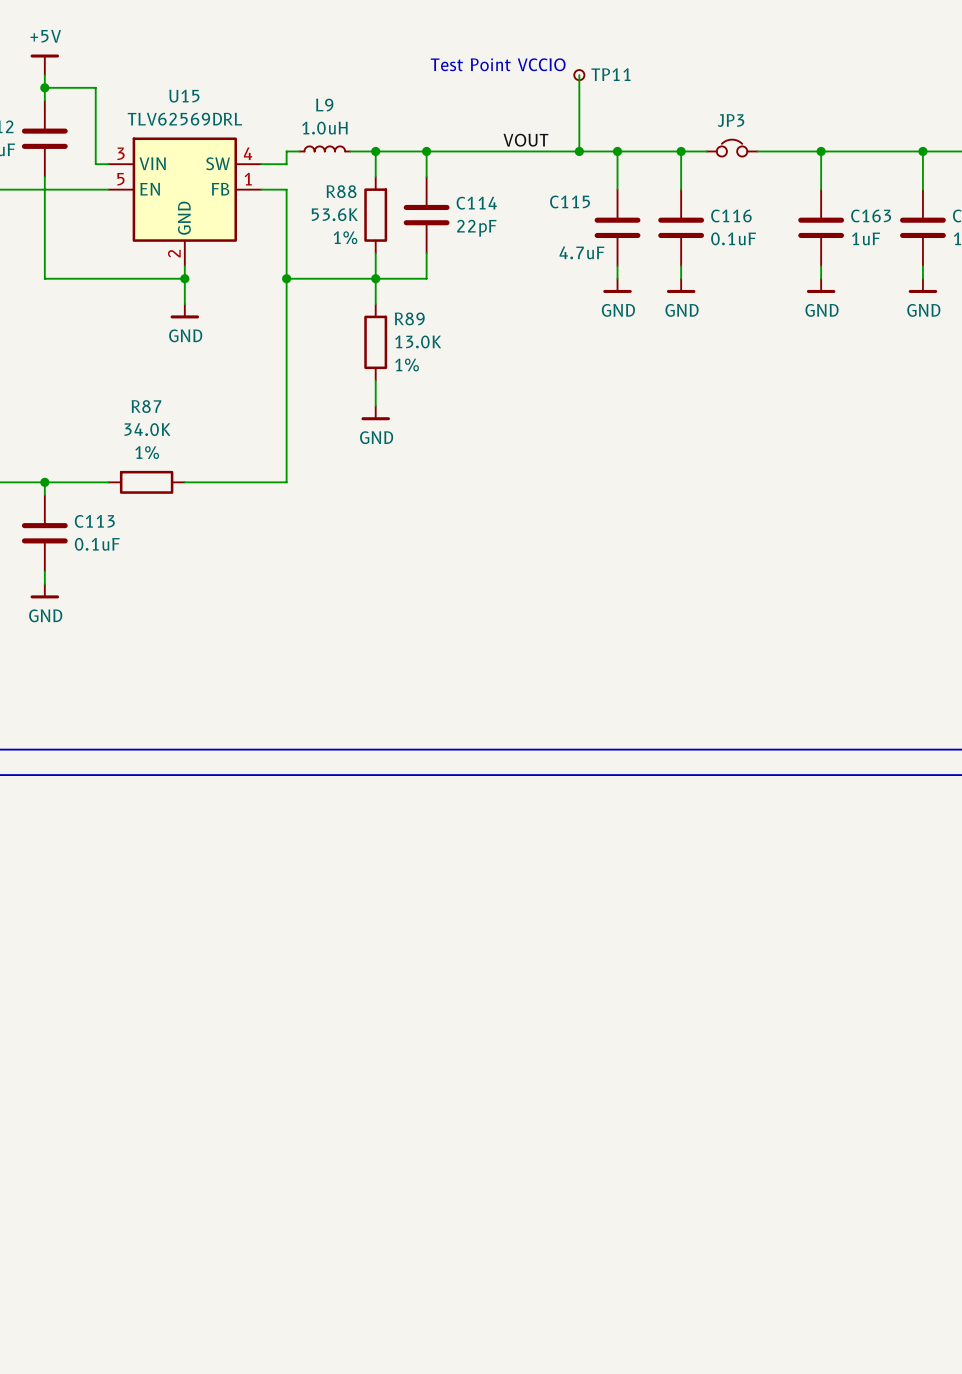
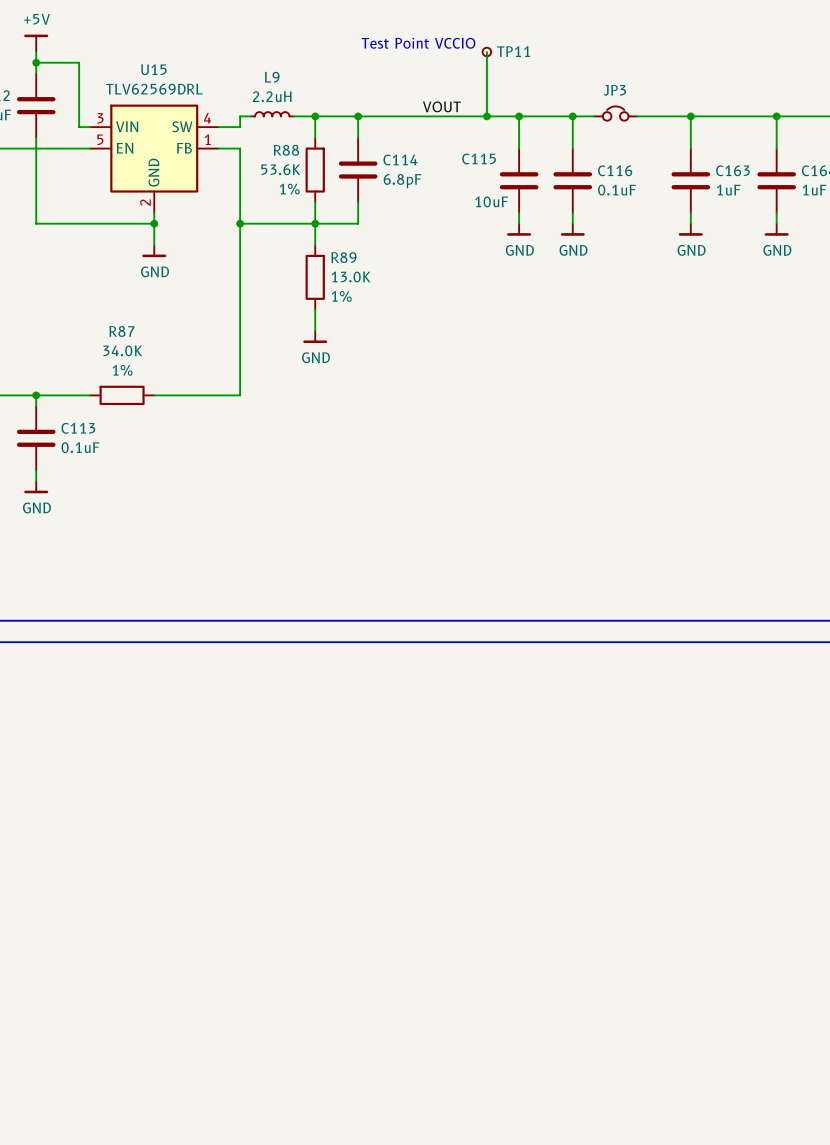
L9 value: 1.0uH (324, 128) -> 2.2uH (272, 96)
C114 value: 22pF (476, 228) -> 6.8pF (402, 181)
C115 value: 4.7uF (581, 252) -> 10uF (491, 201)

